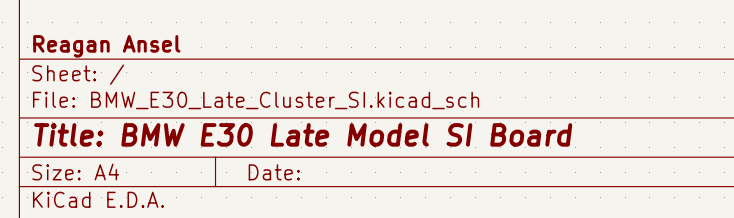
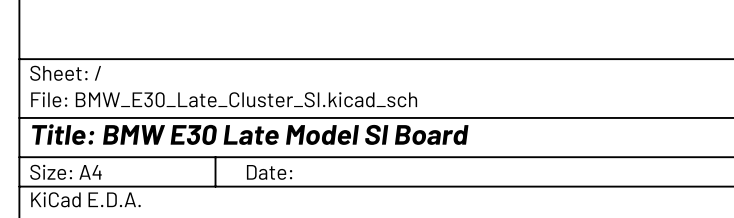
title block: Reagan Ansel (106, 46) -> none

